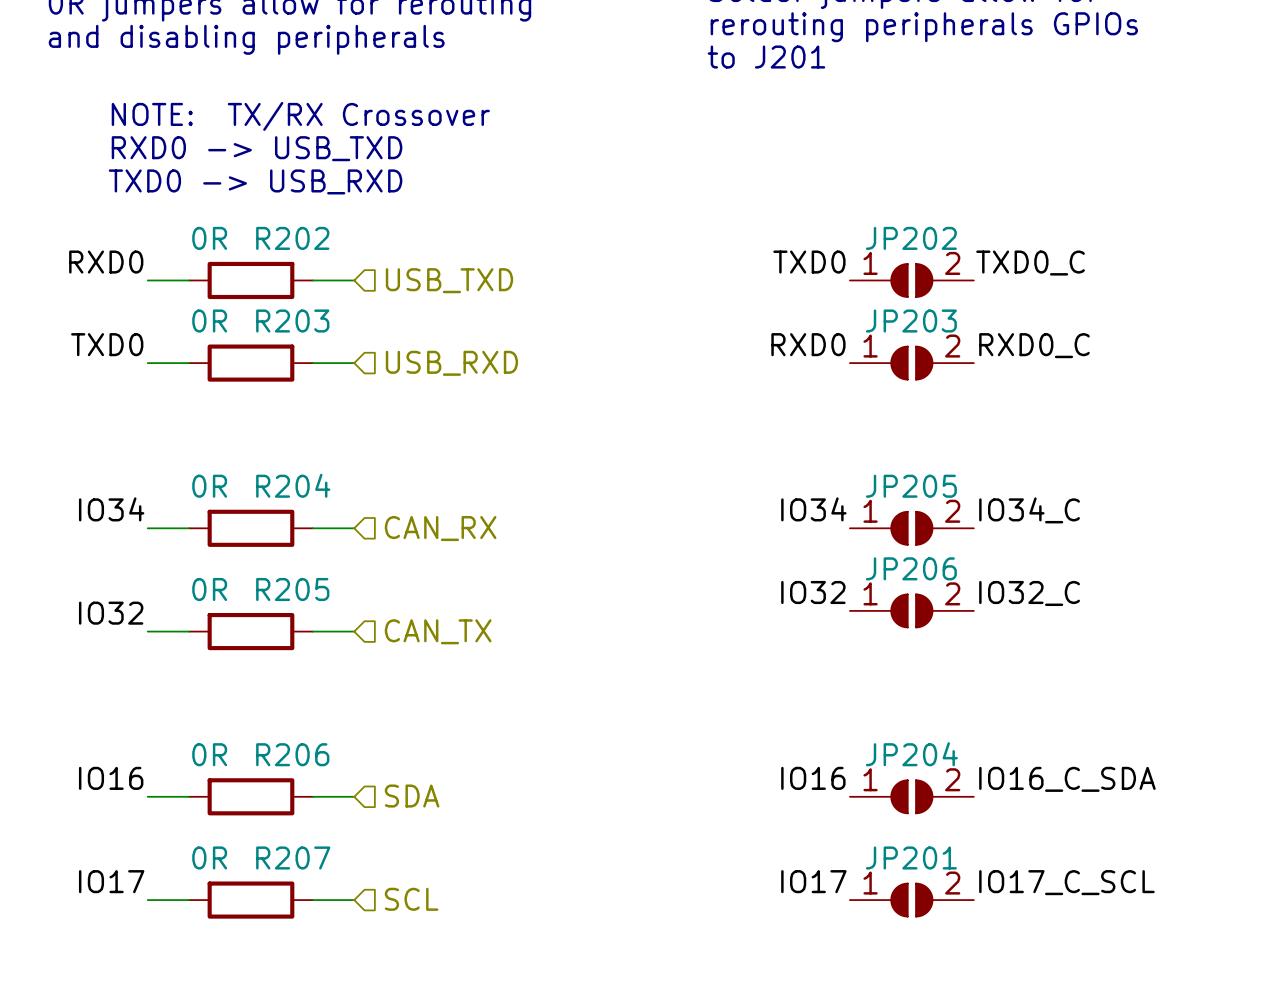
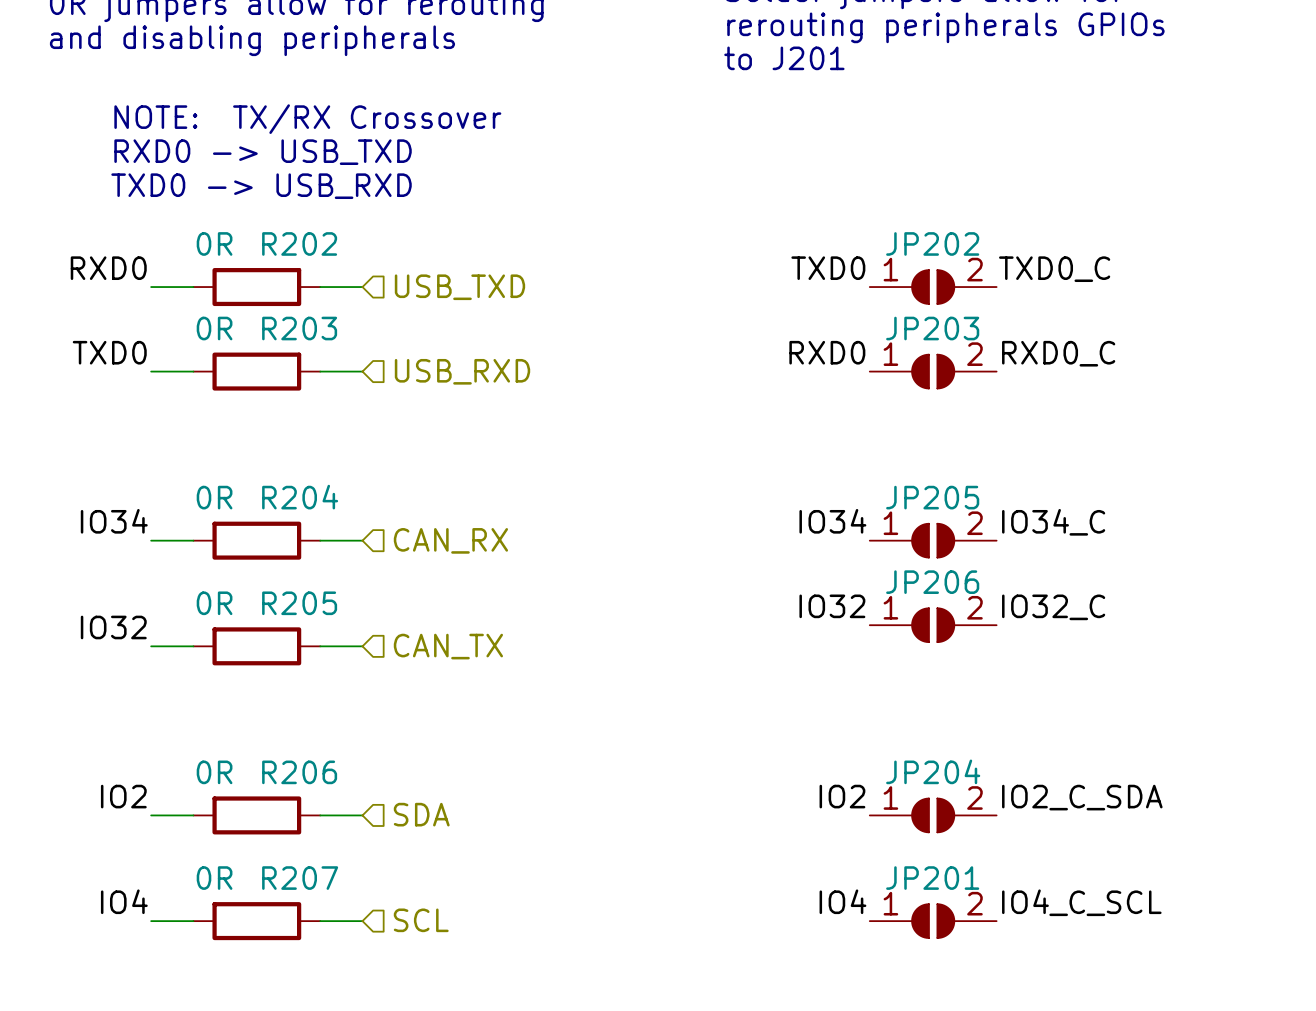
label: IO16 (111, 778) -> IO2 (123, 796)
label: IO16 (813, 778) -> IO2 (842, 796)
label: IO16_C_SDA (1067, 779) -> IO2_C_SDA (1082, 797)
label: IO17 (111, 881) -> IO4 (124, 901)
label: IO17 (813, 881) -> IO4 (842, 901)
label: IO17_C_SCL (1066, 882) -> IO4_C_SCL (1081, 902)

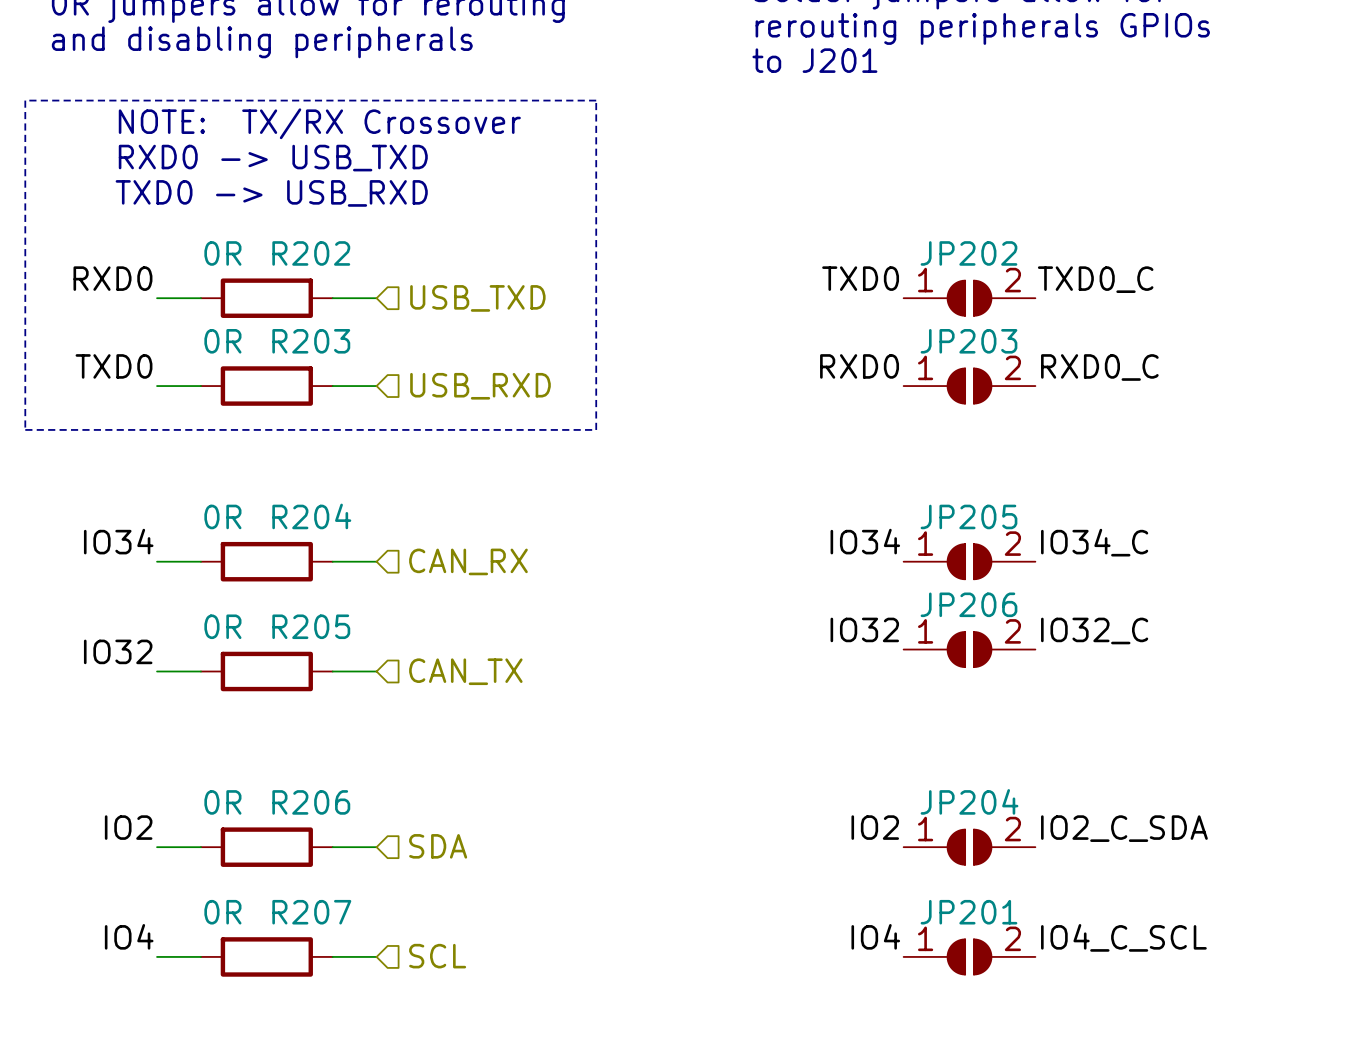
line: none -> (25, 100) (596, 100) (596, 429) (25, 429) (25, 100)

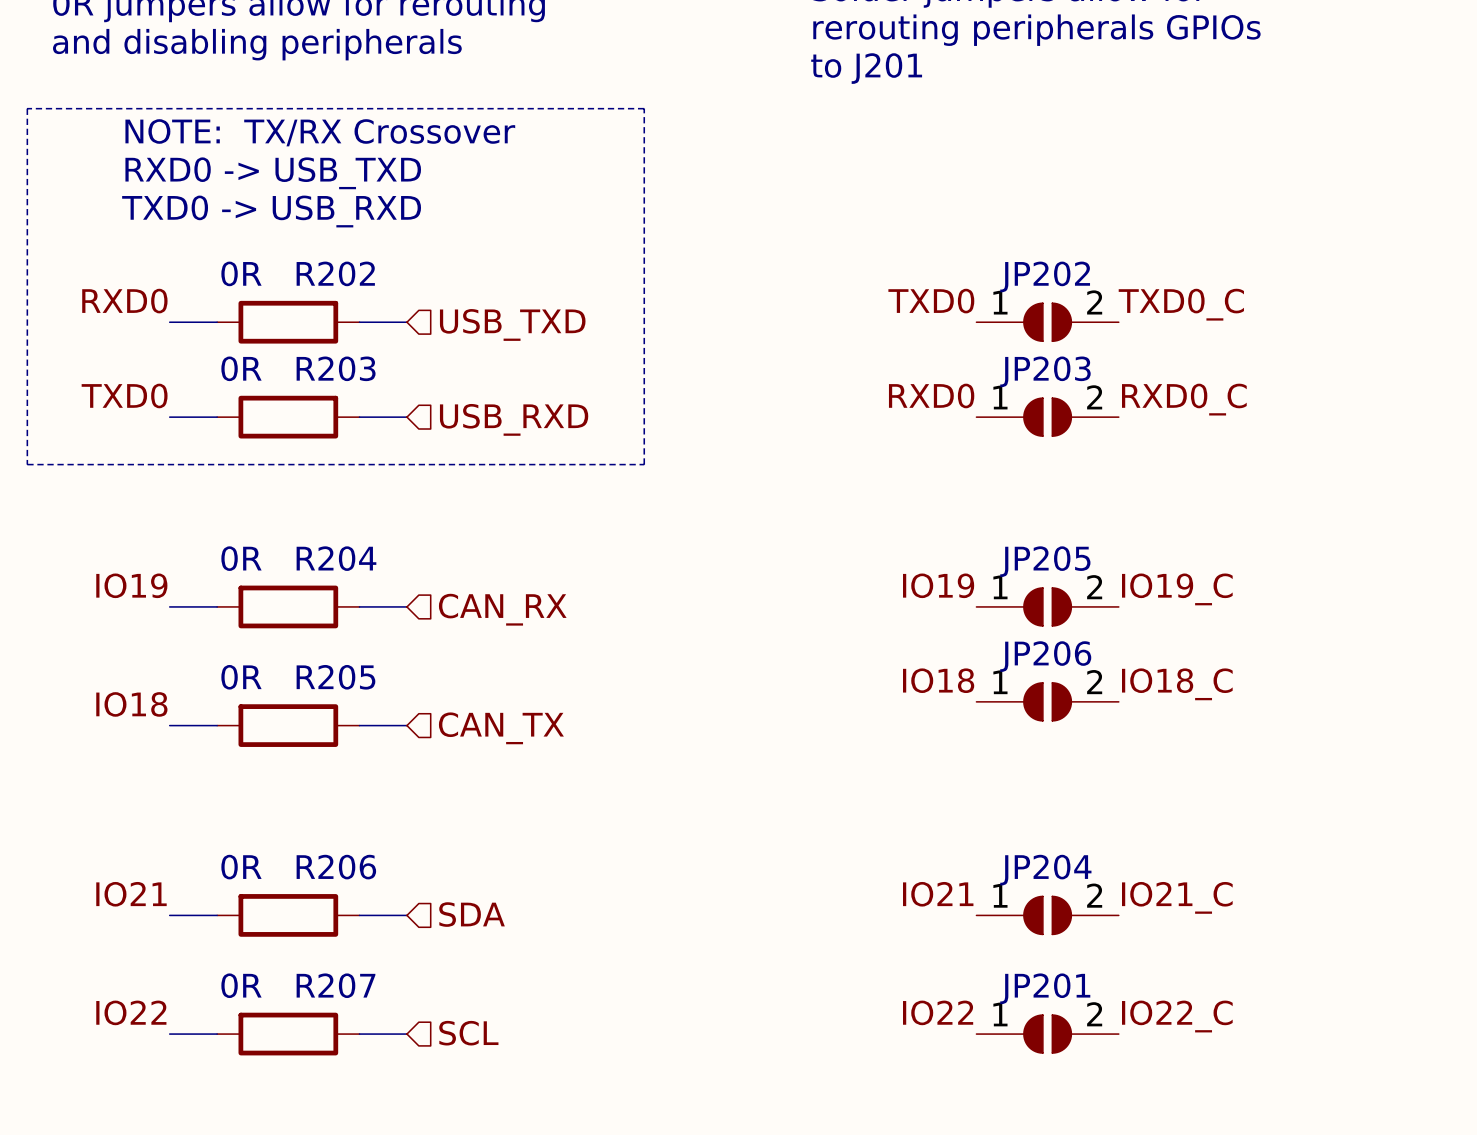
label: IO34 (118, 541) -> IO19 (131, 585)
label: IO34 (865, 541) -> IO19 (938, 585)
label: IO34_C (1094, 542) -> IO19_C (1177, 589)
label: IO32 (864, 629) -> IO18 (938, 680)
label: IO32_C (1094, 630) -> IO18_C (1177, 684)
label: IO32 (118, 651) -> IO18 (131, 704)
label: IO2 (128, 827) -> IO21 (131, 894)
label: IO2 (875, 827) -> IO21 (938, 894)
label: IO2_C_SDA (1124, 828) -> IO21_C (1177, 897)
label: IO4 (129, 936) -> IO22 (131, 1012)
label: IO4 (875, 936) -> IO22 (938, 1012)
label: IO4_C_SCL (1123, 937) -> IO22_C (1177, 1016)

